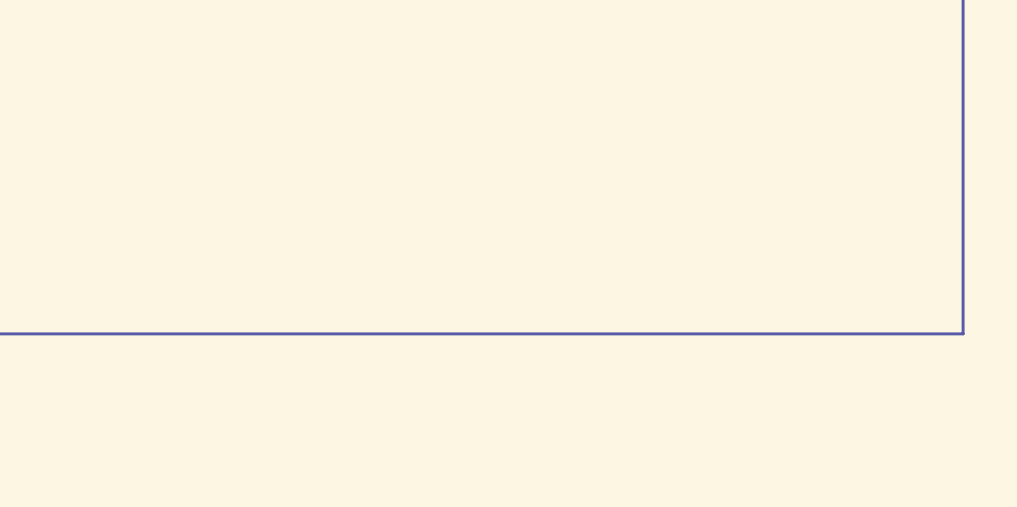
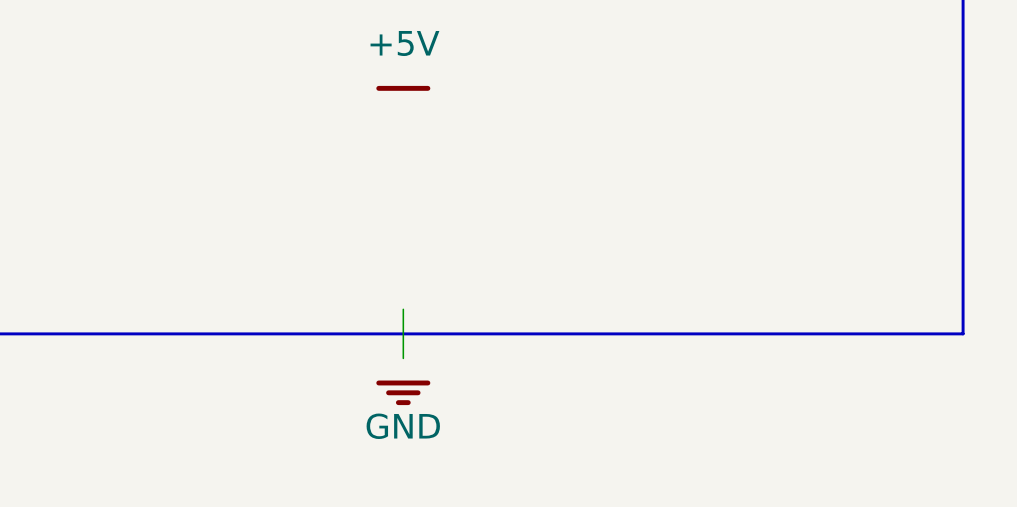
power symbol: none -> +5V (403, 88)
wire: none -> (403, 309) (403, 358)
power symbol: none -> GND (403, 392)

